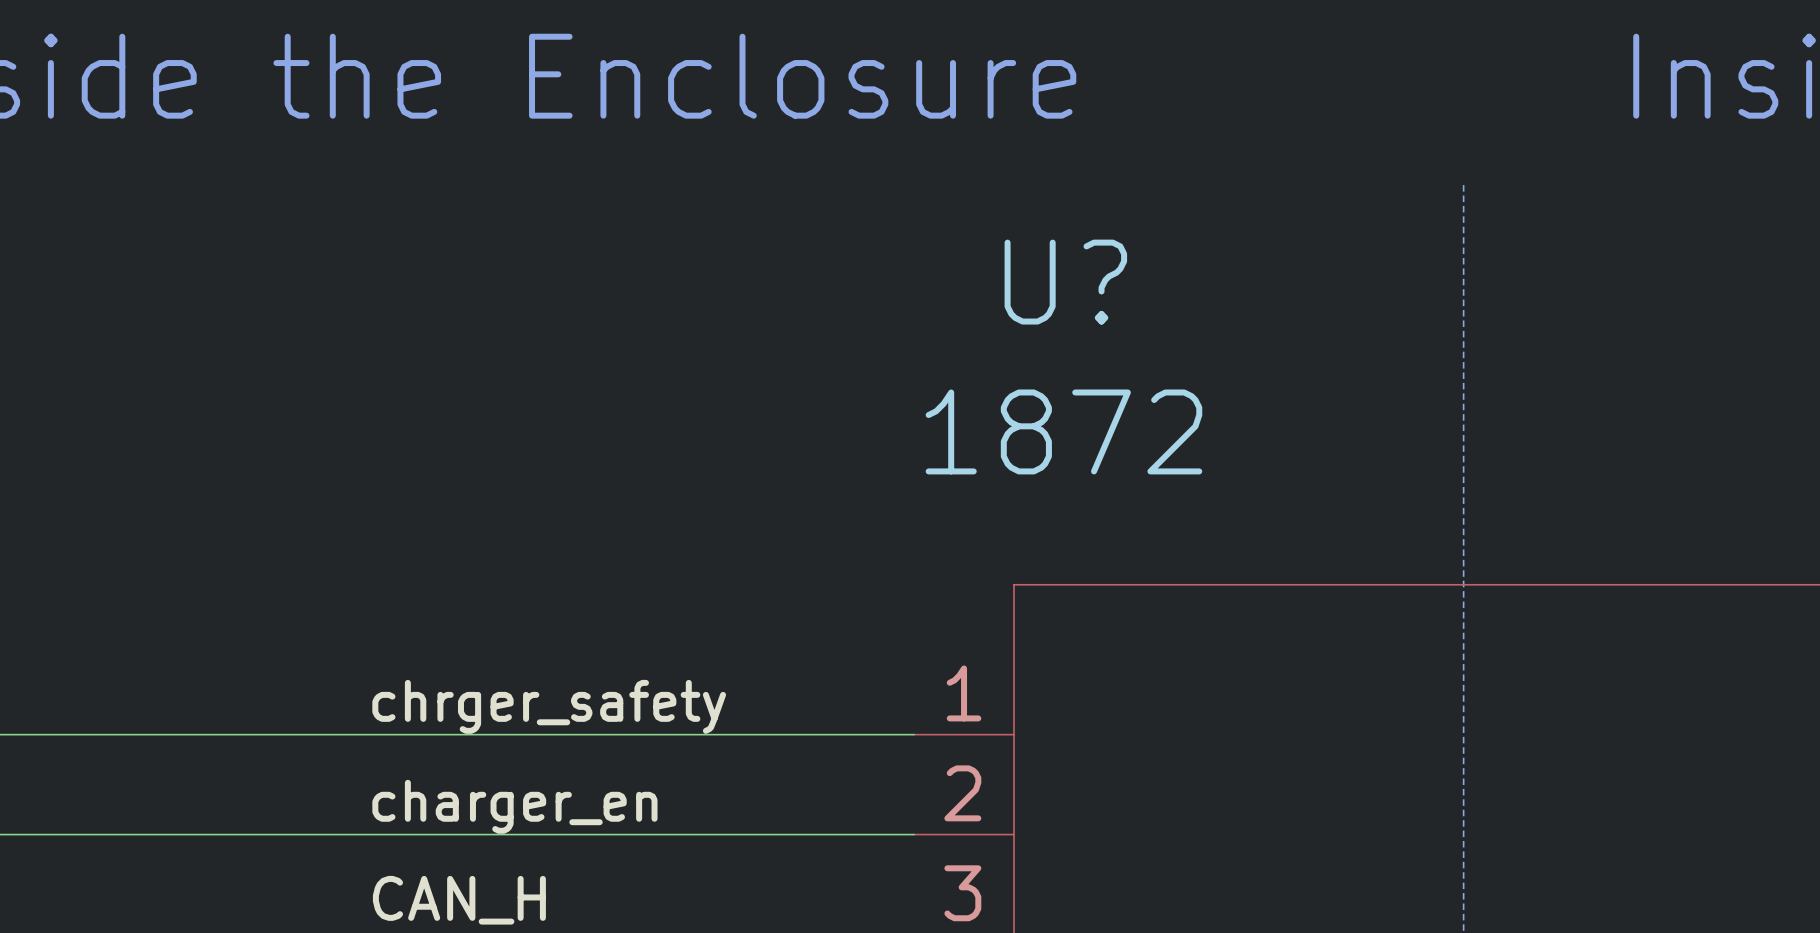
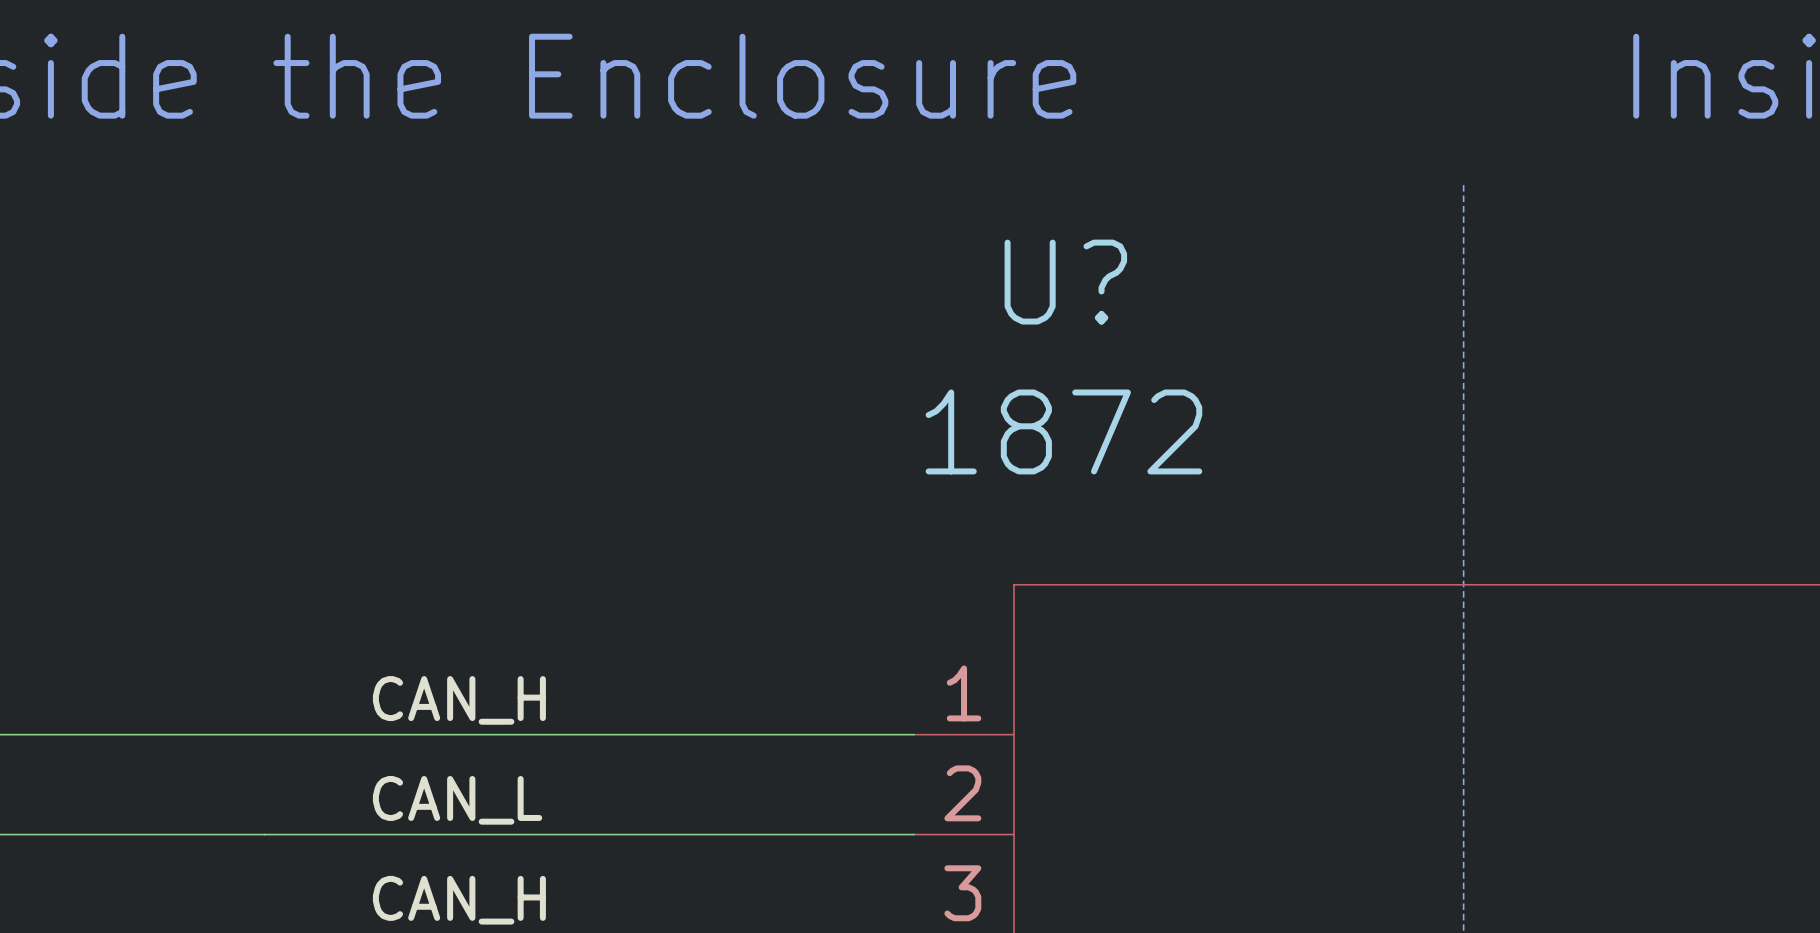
label: chrger_safety (549, 706) -> CAN_H (459, 700)
label: charger_en (514, 806) -> CAN_L (457, 800)

